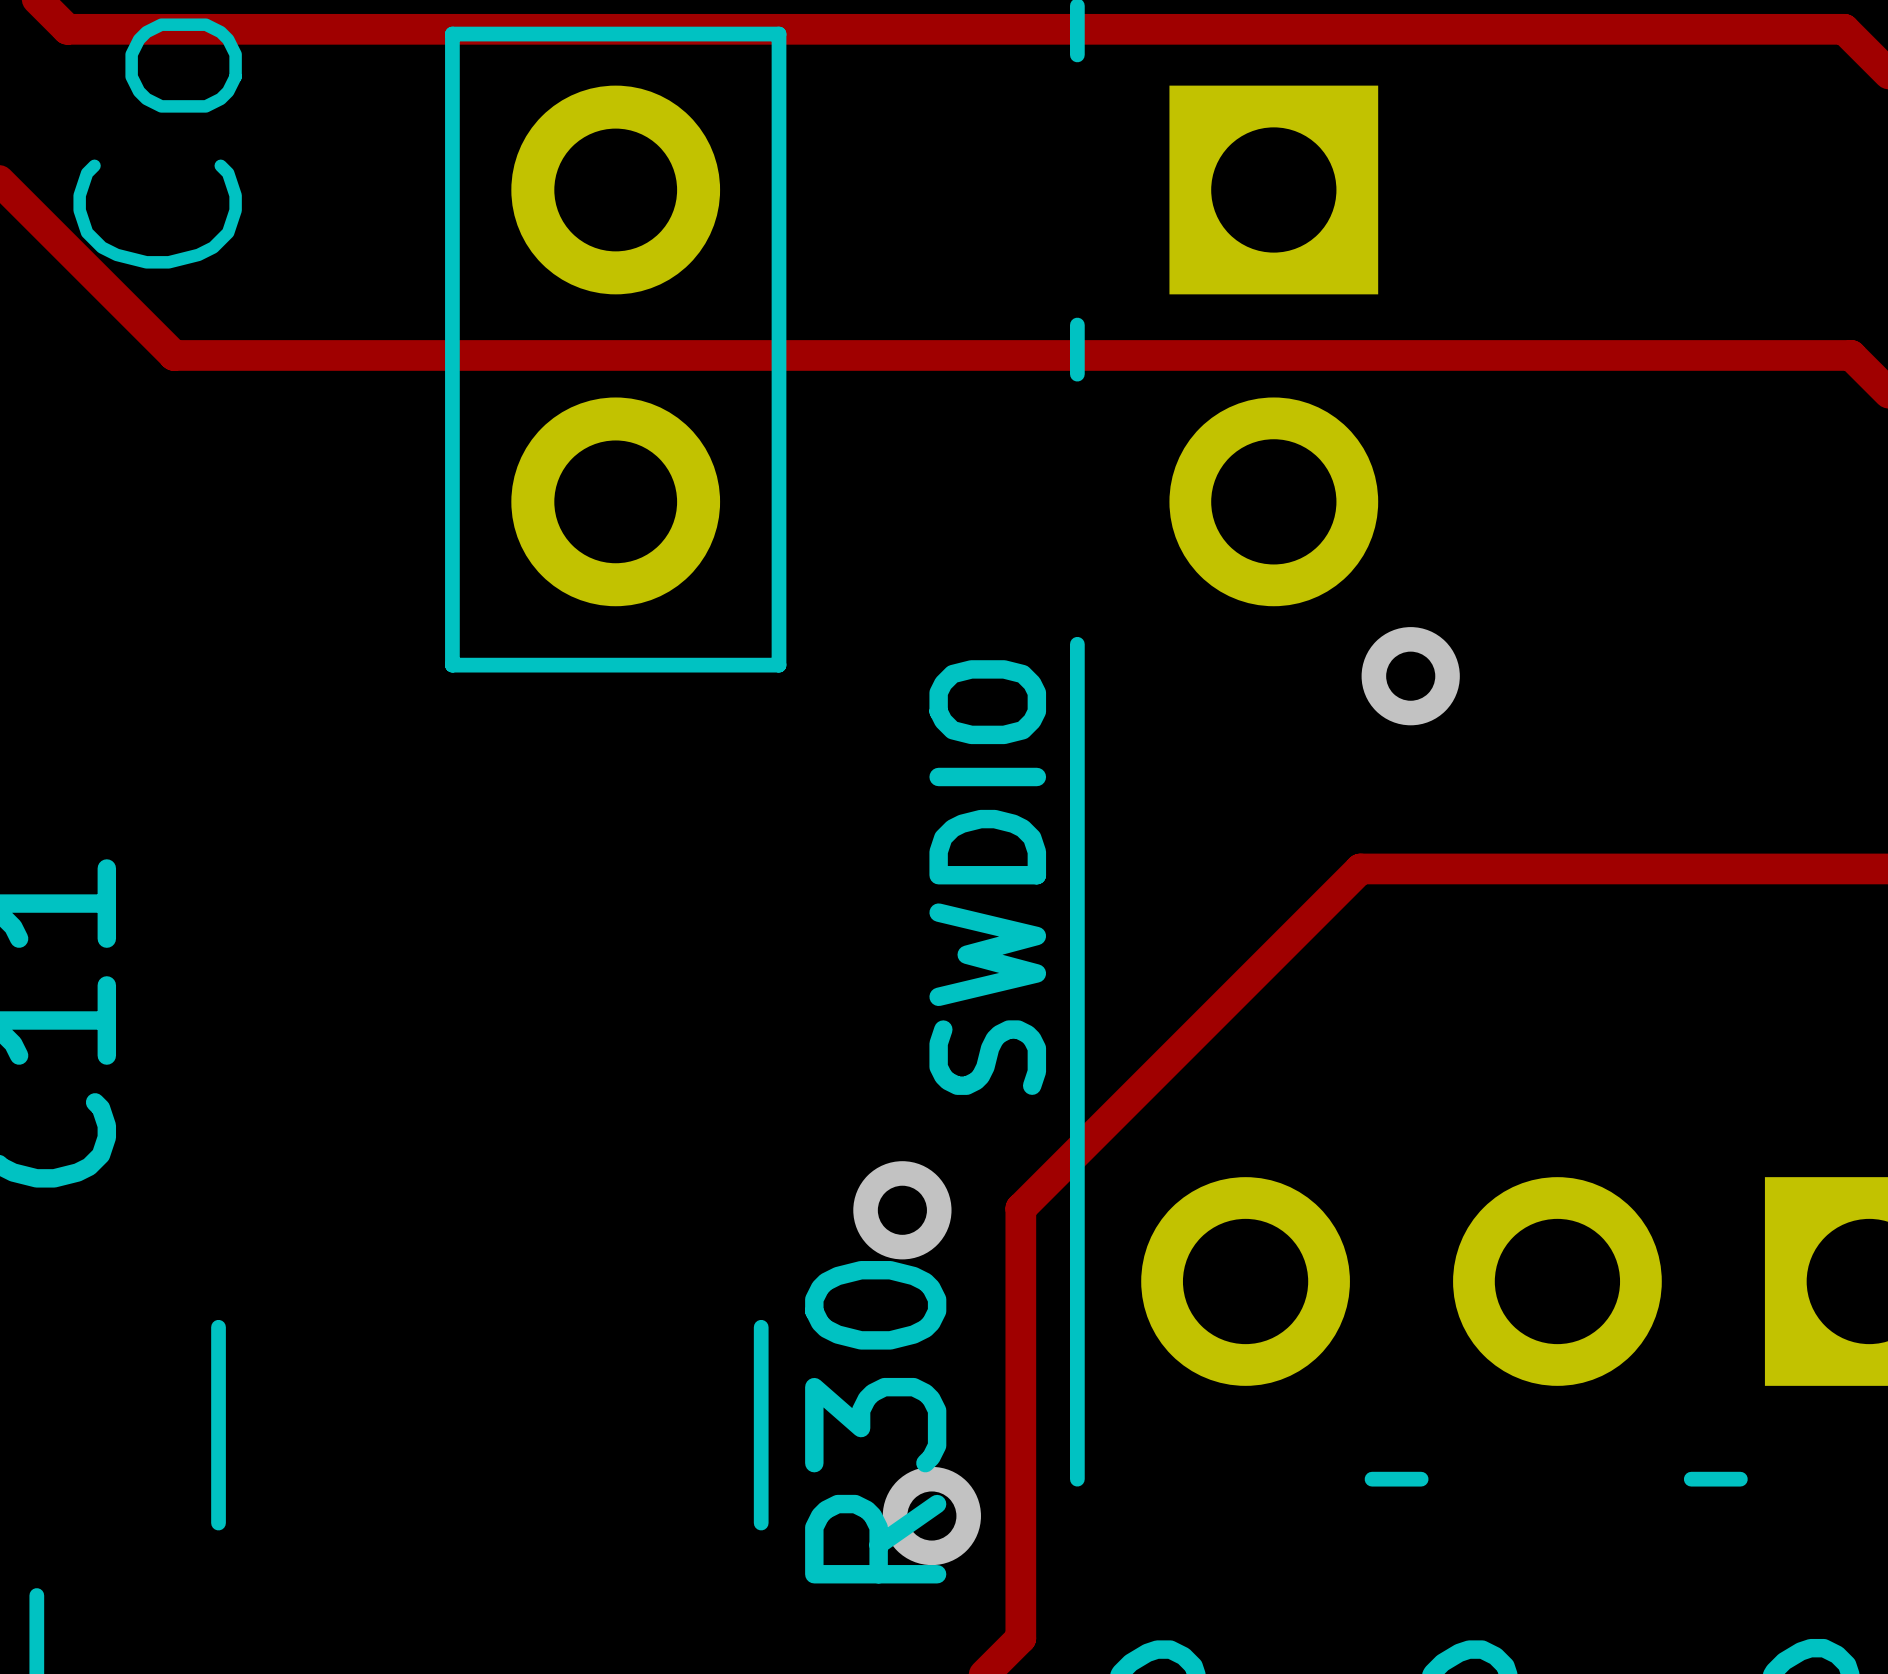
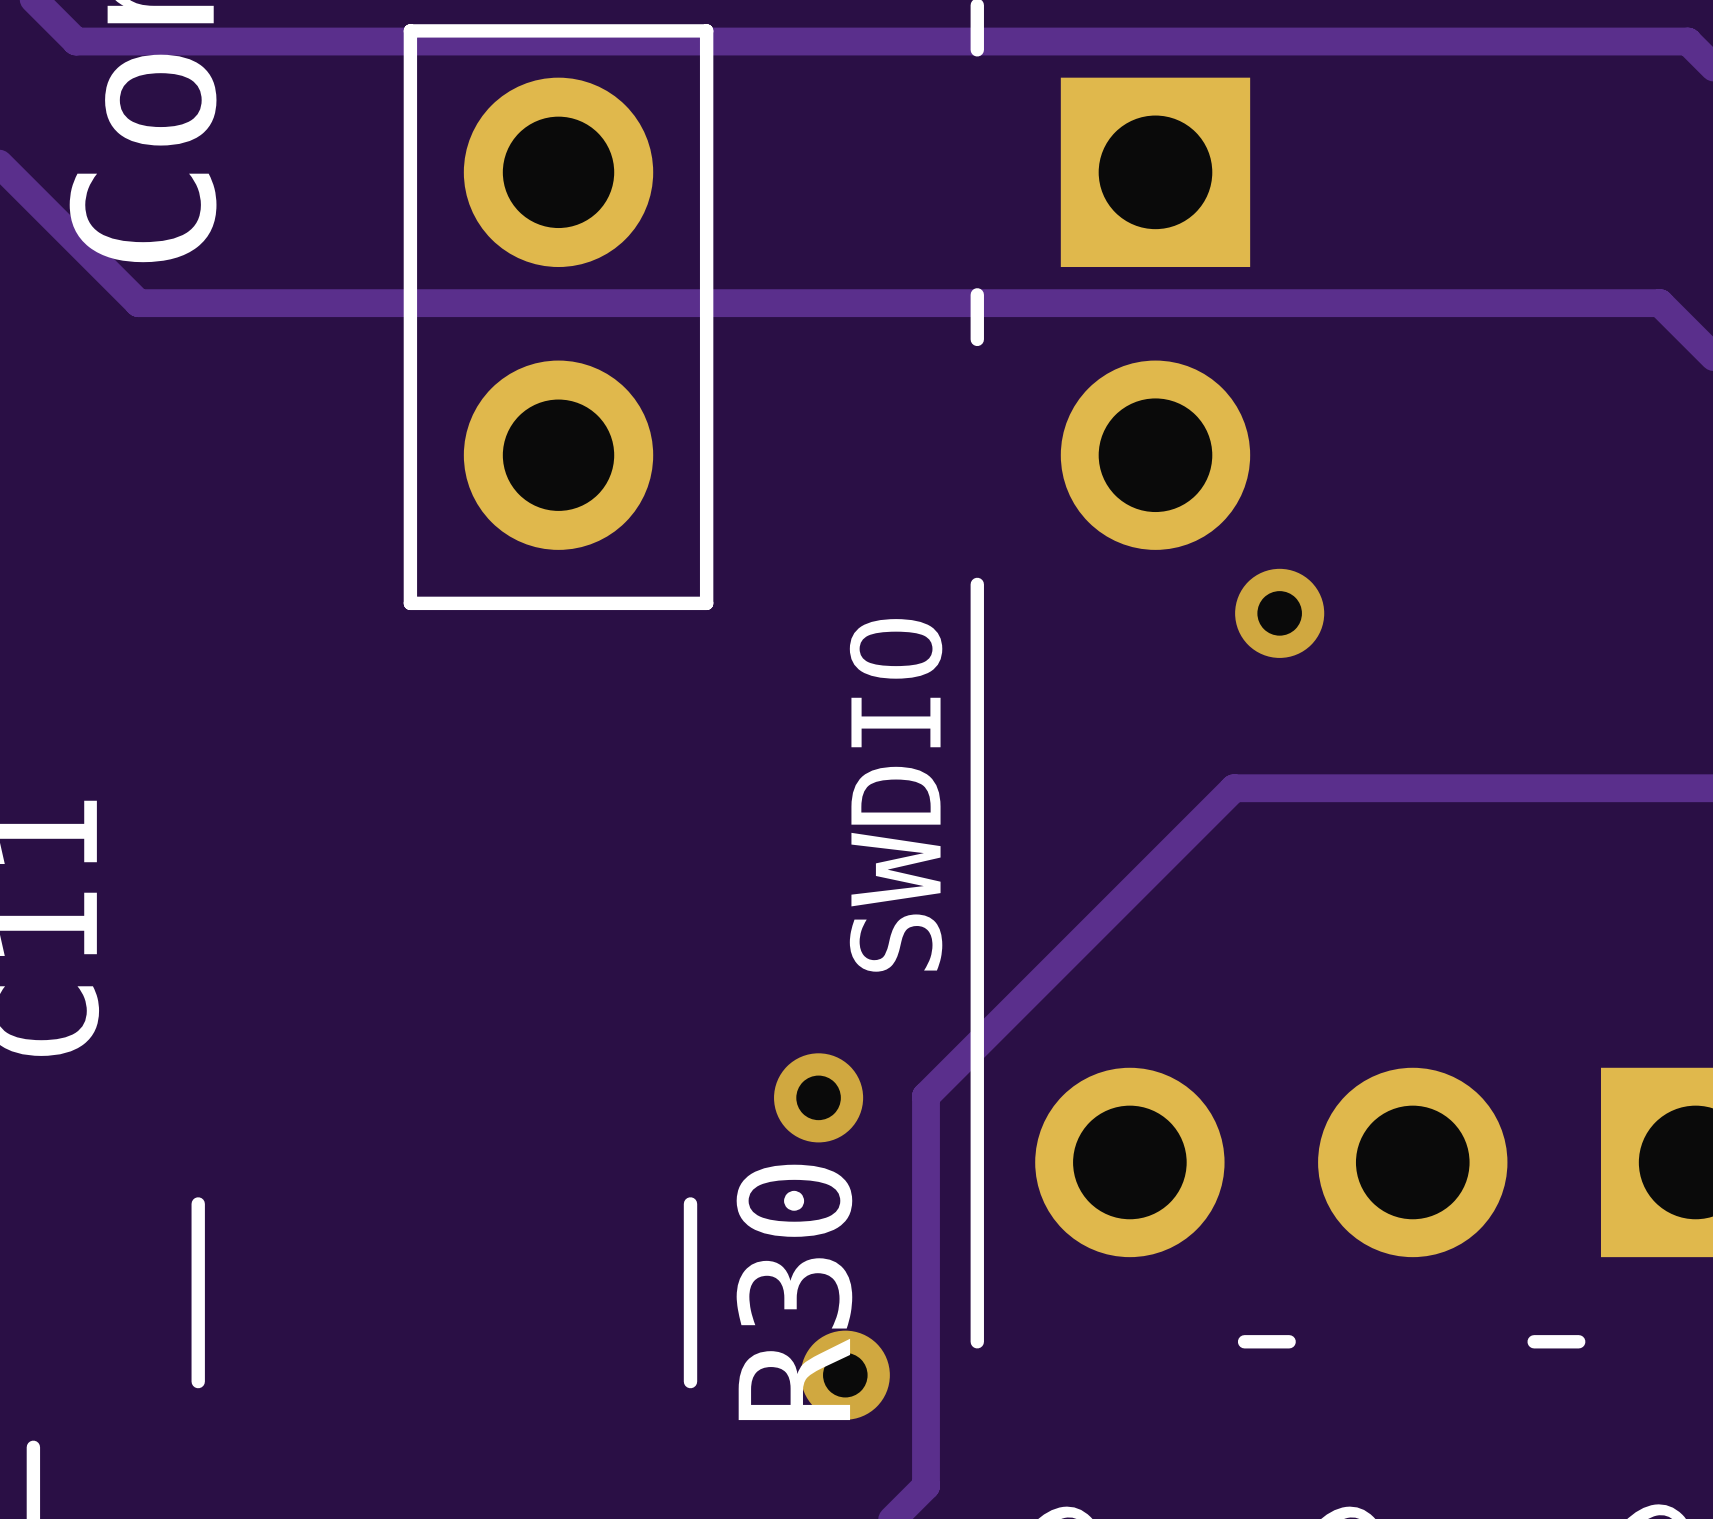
track: (67, 29) (1844, 29) (1860, 45) -> (61, 26) (76, 41) (1687, 41)
track: (152, 334) (174, 355) (1851, 355) -> (138, 303) (1659, 303) (1679, 322)

